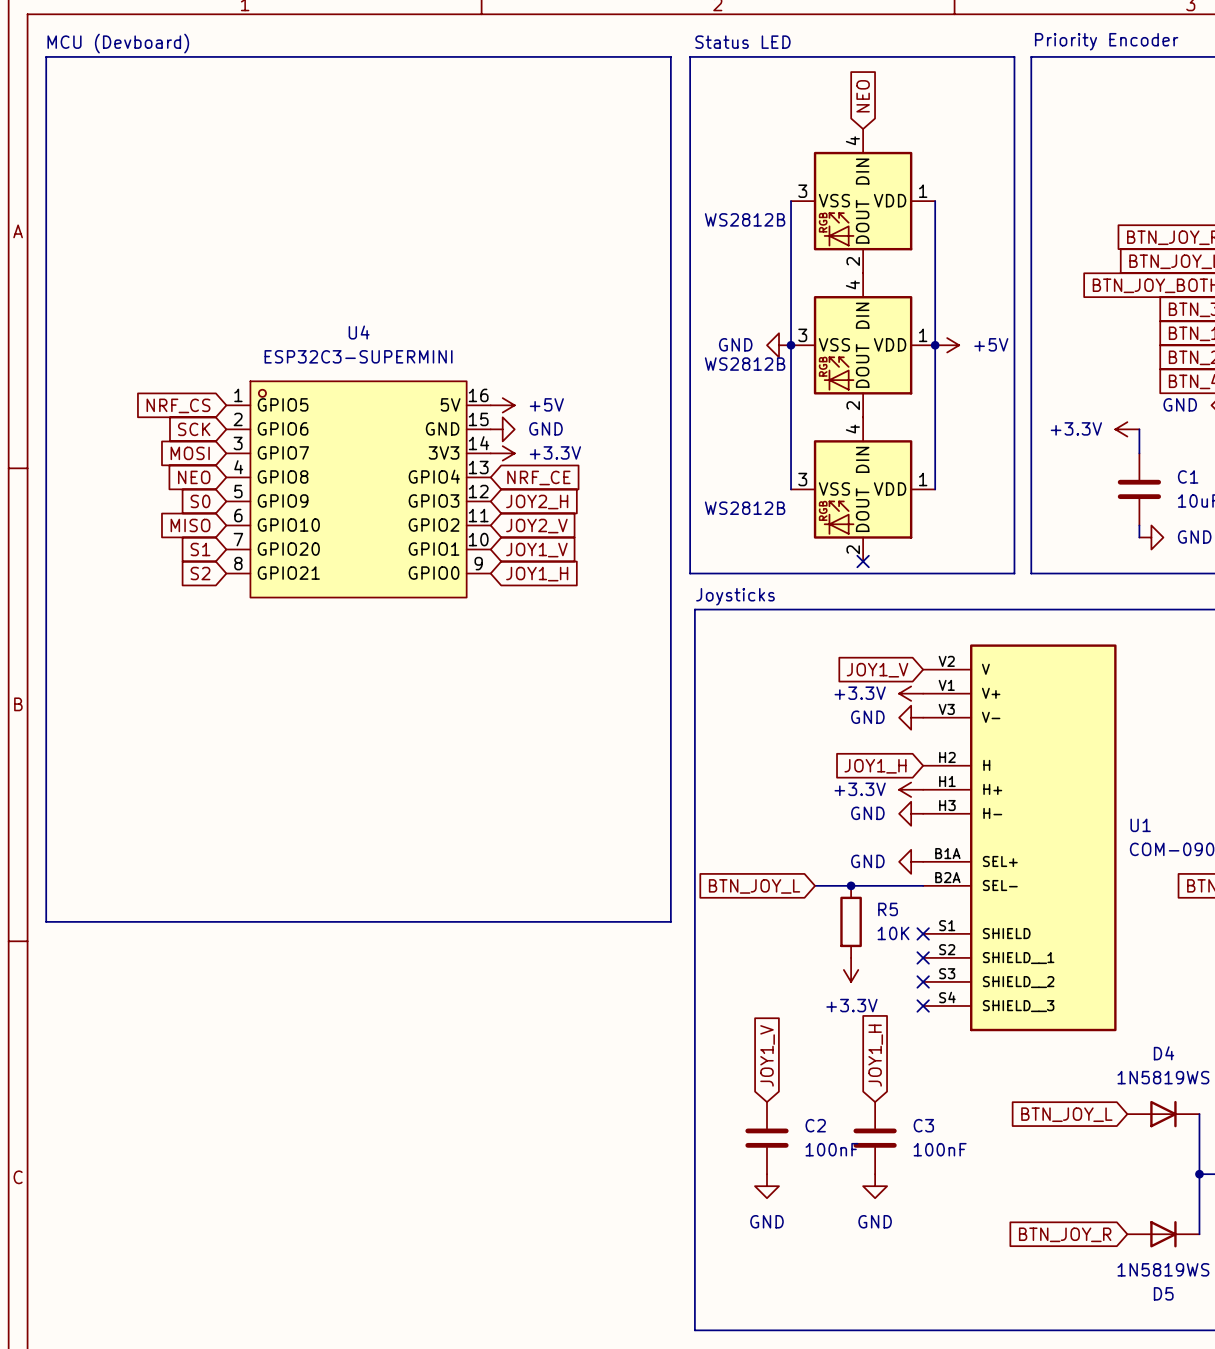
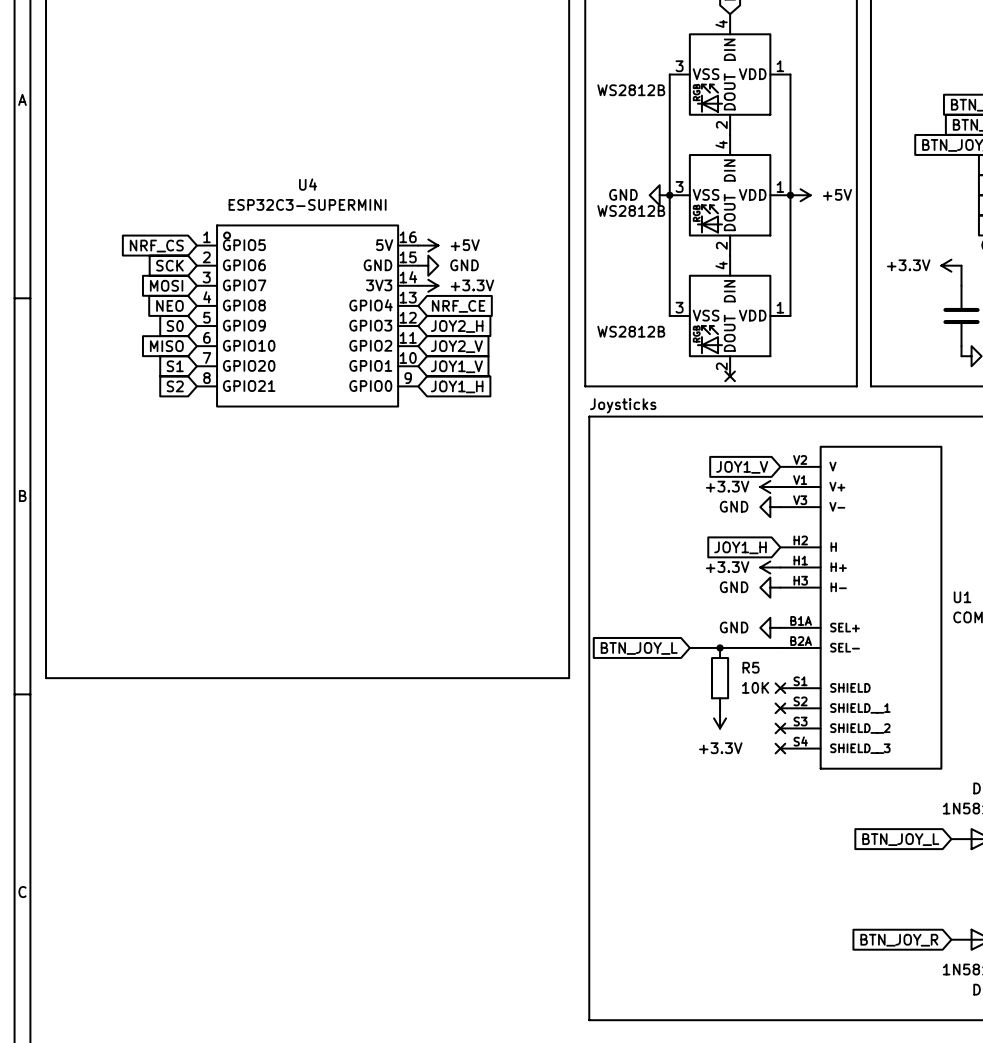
global label: JOY1_V (767, 1055) -> none
global label: JOY1_H (875, 1055) -> none
C2: 100nF (766, 1138) -> none
C3: 100nF (875, 1138) -> none
power symbol: GND (766, 1186) -> none
power symbol: GND (875, 1186) -> none

